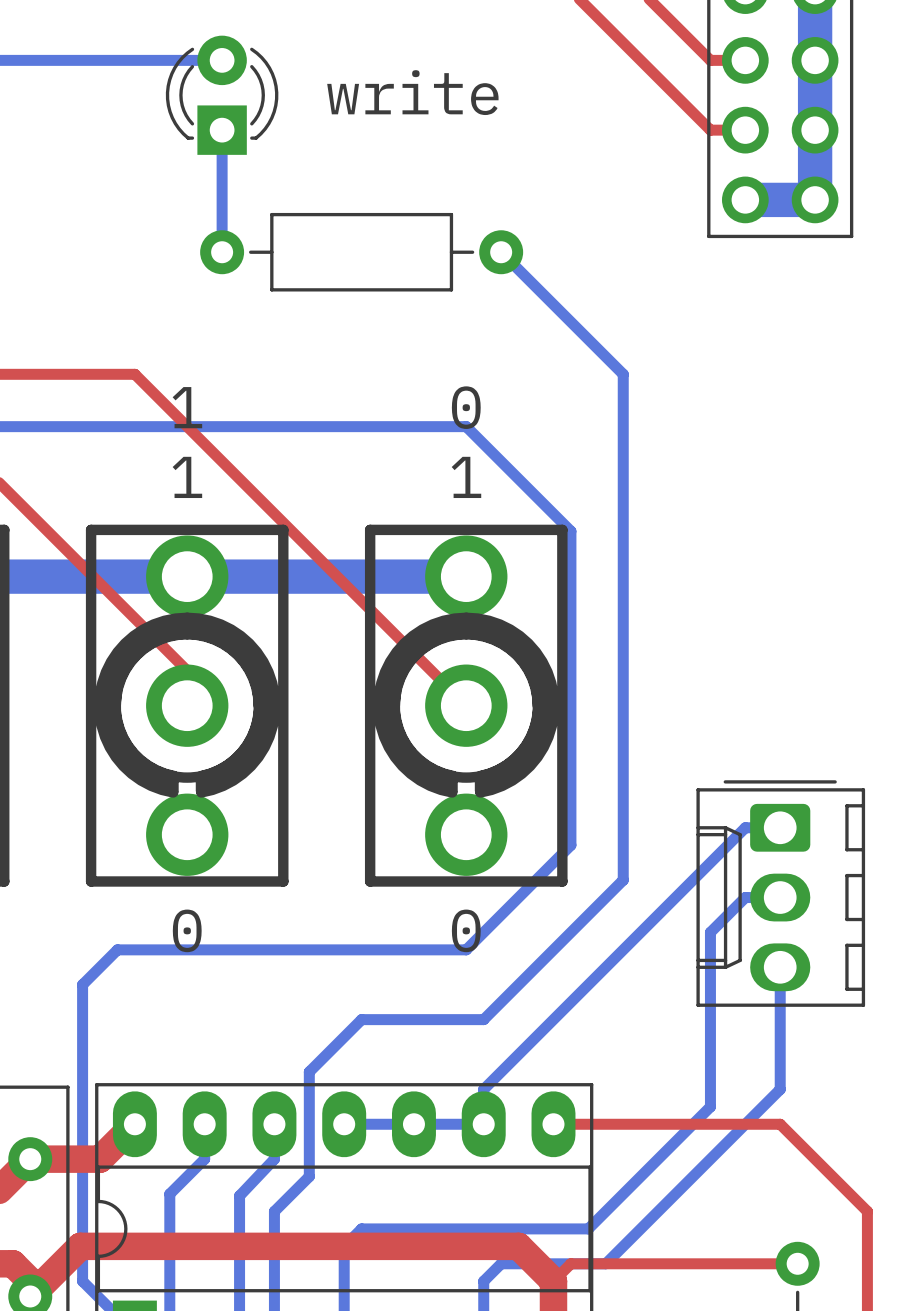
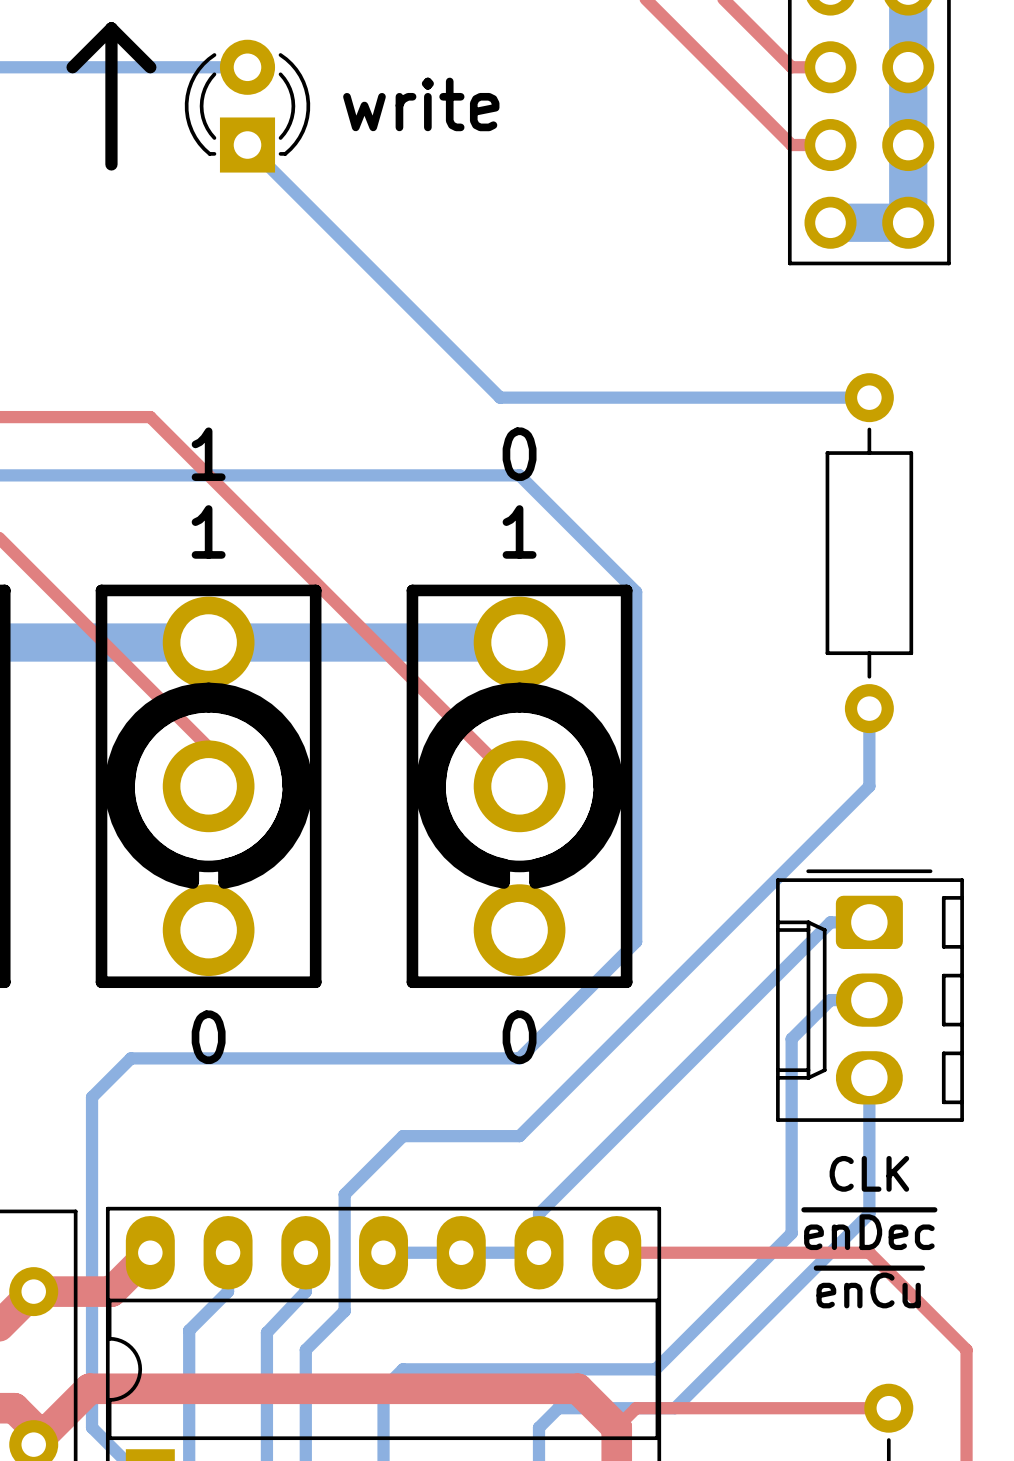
line: none -> (111, 28) (72, 67)
line: none -> (111, 28) (150, 67)
line: none -> (111, 28) (111, 164)
text position: write (412, 92) -> write (421, 104)
bottom track: (222, 130) (222, 252) -> (247, 145) (500, 397) (869, 397)
part rotation: 0° (361, 252) -> 90° clockwise (869, 553)
part position: (361, 252) -> (869, 553)
bottom track: (501, 252) (623, 374) (623, 880) (483, 1019) (466, 1019) -> (869, 708) (869, 786) (519, 1136)
text: none -> CLK (869, 1173)
text: none -> ~{enDec} (869, 1228)
text: none -> ~{enCu} (869, 1286)

